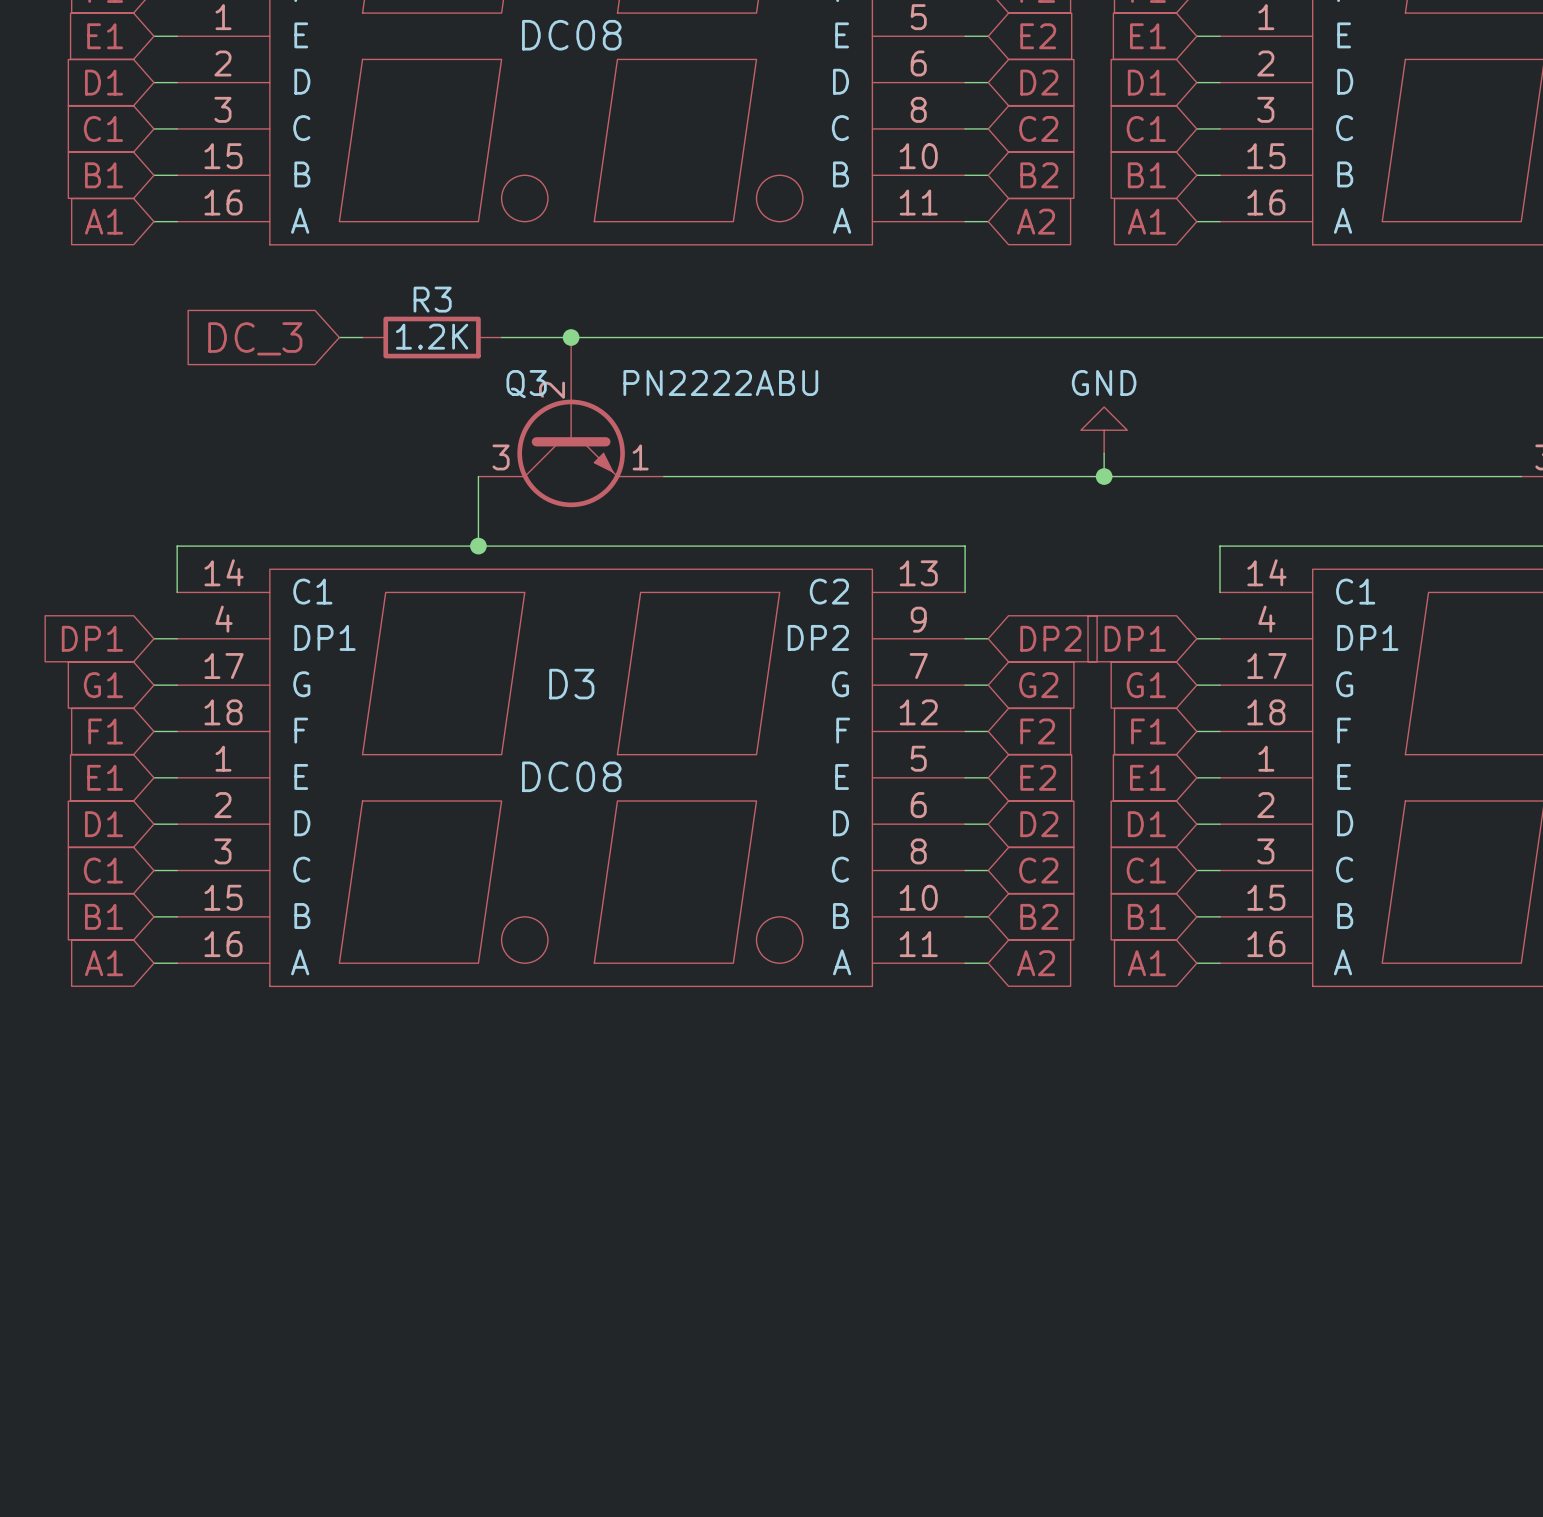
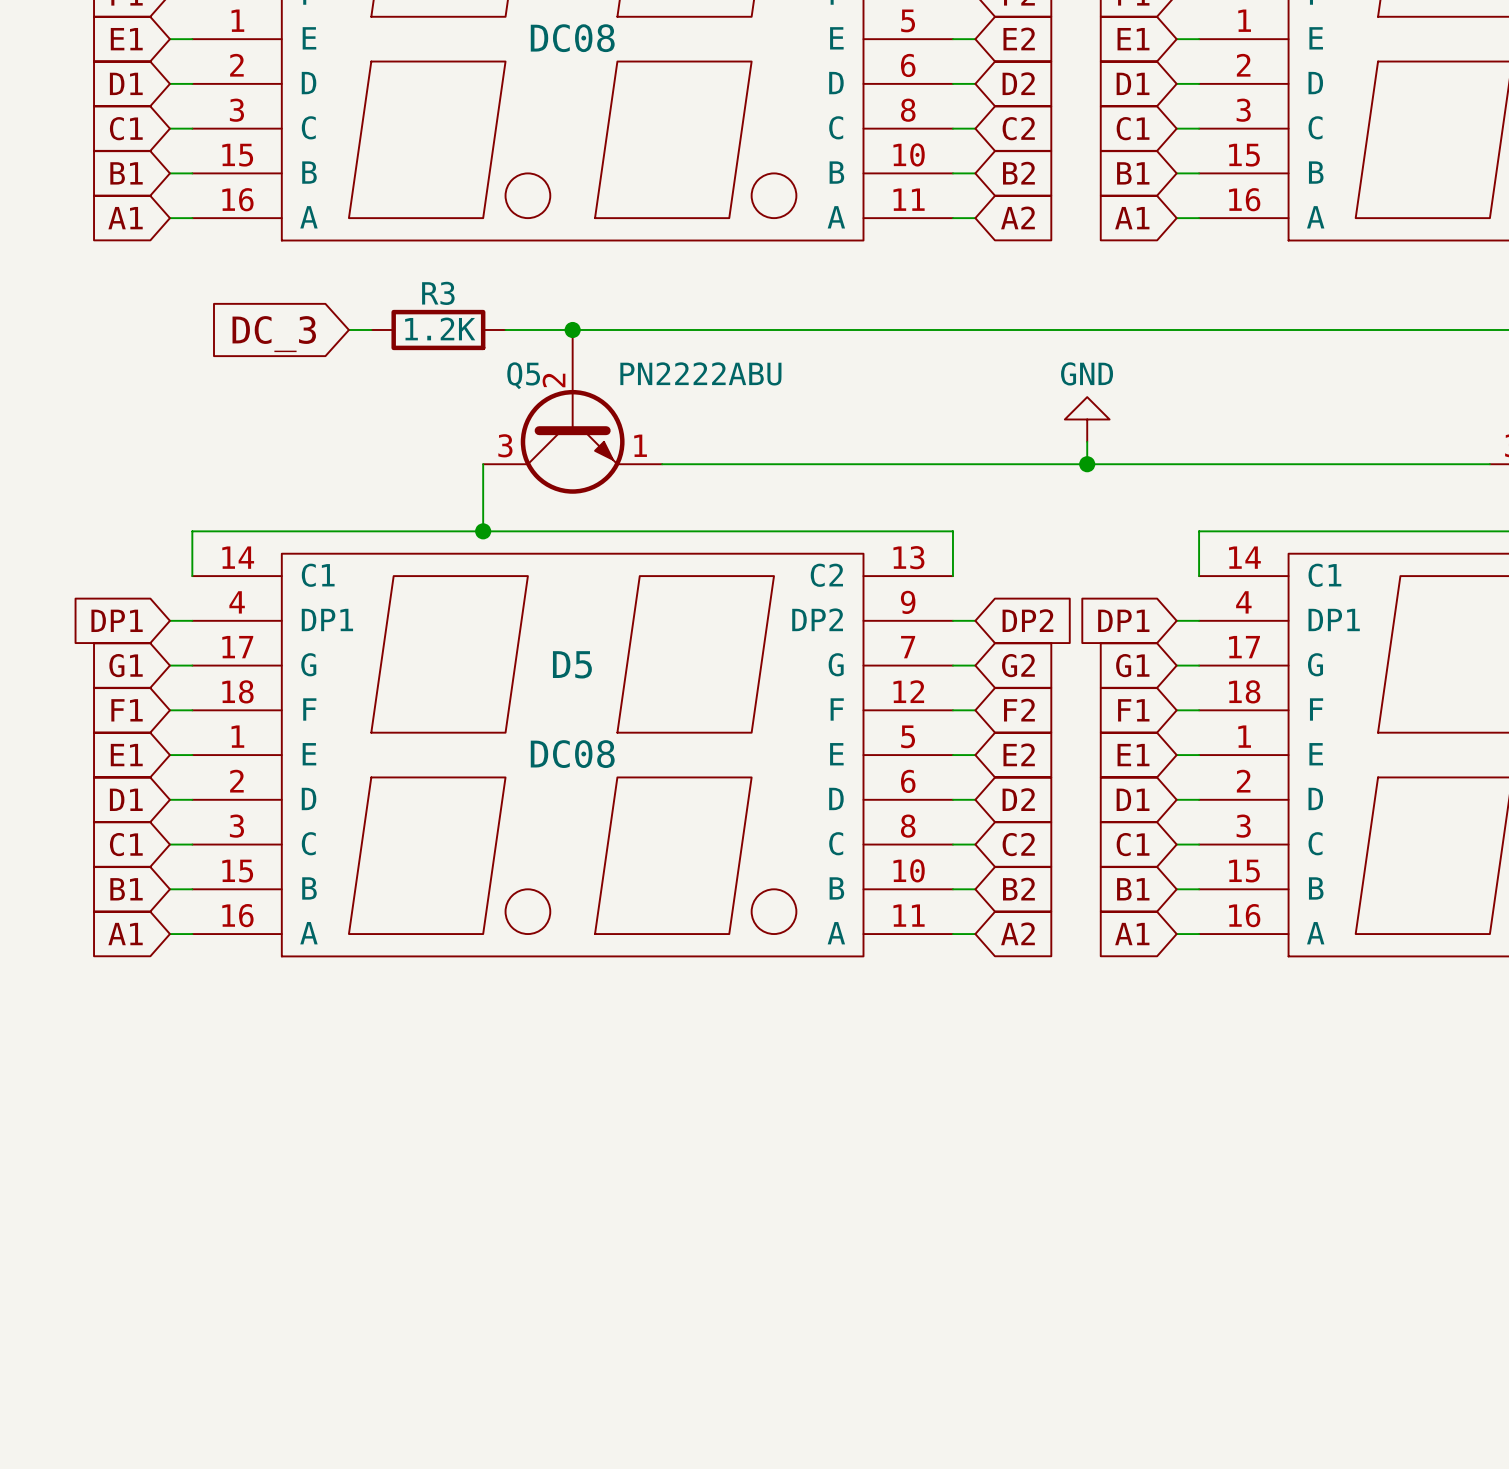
Q3 name: Q3 (526, 384) -> Q5 (523, 375)
D3 name: D3 (571, 684) -> D5 (572, 664)

